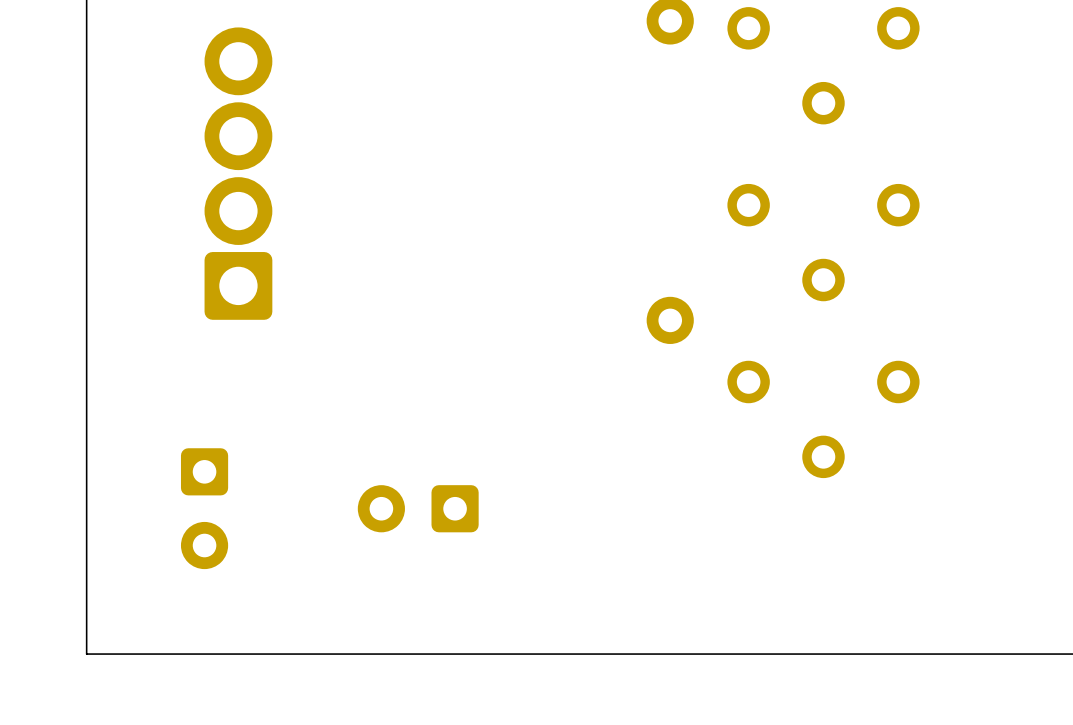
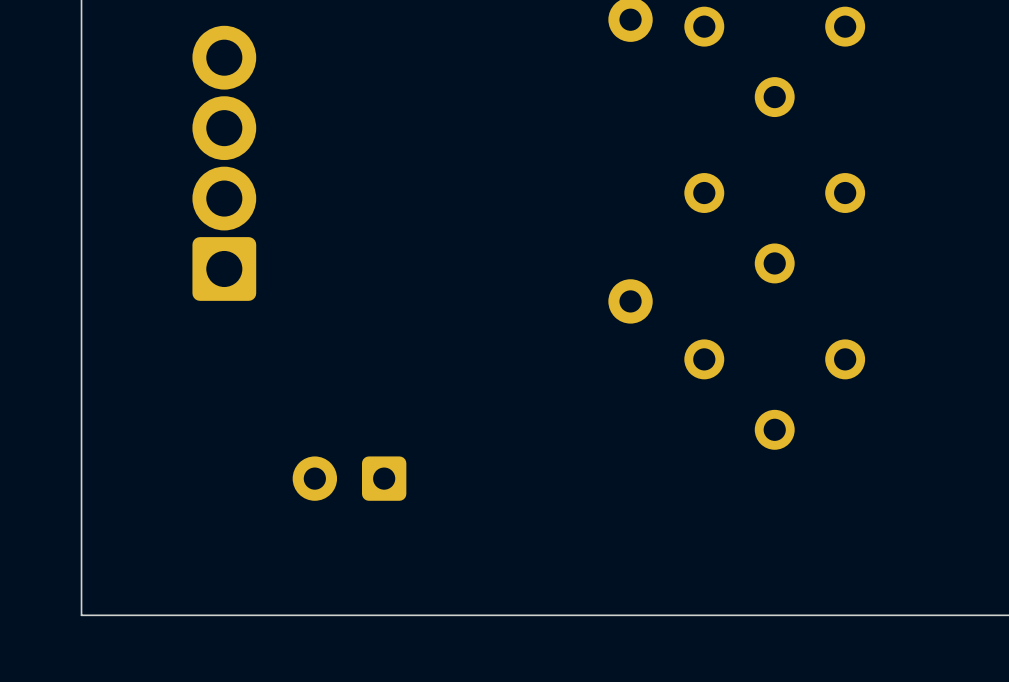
part: (204, 508) -> none
part position: (418, 508) -> (349, 478)

